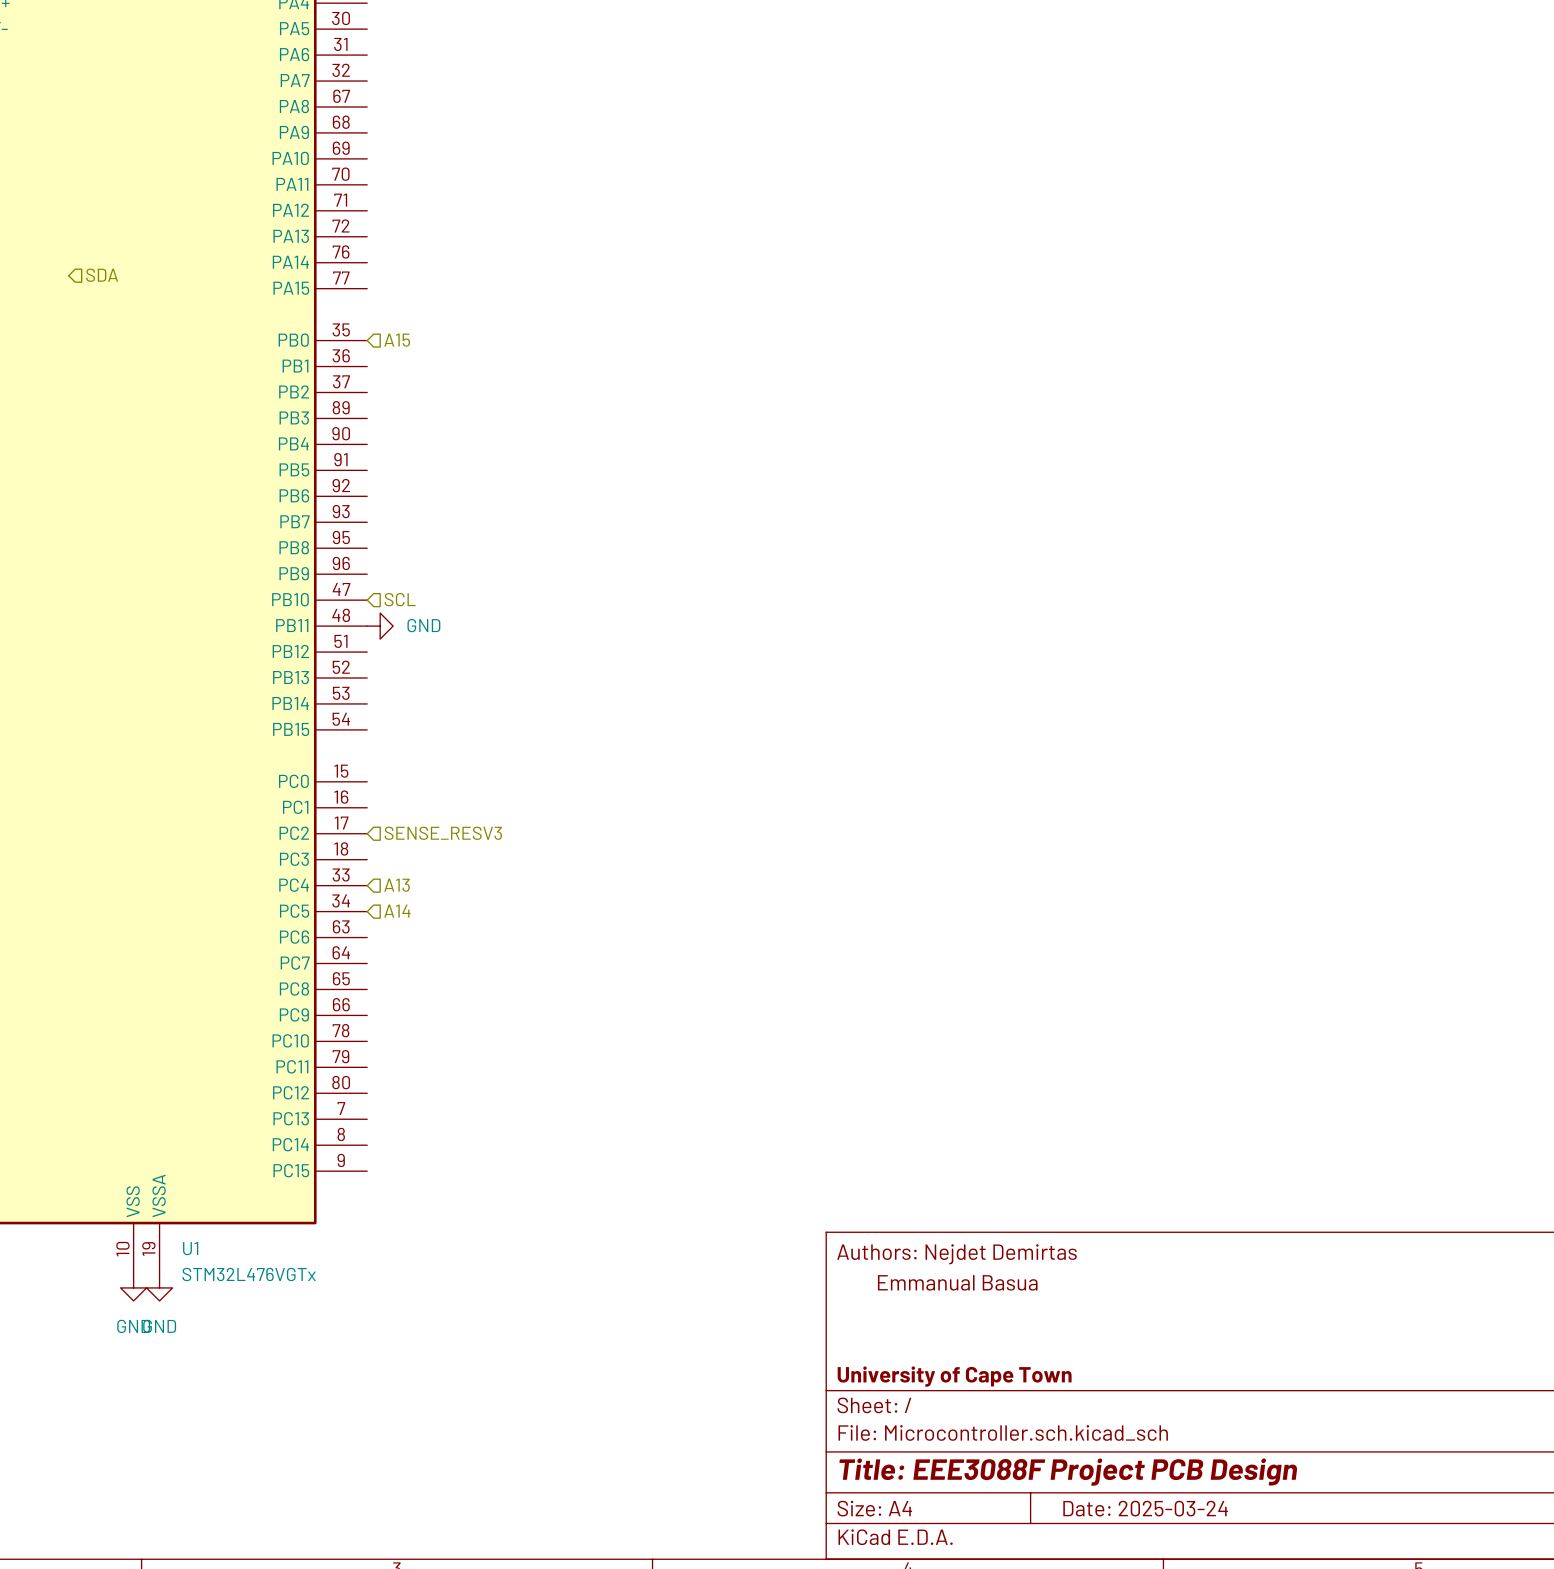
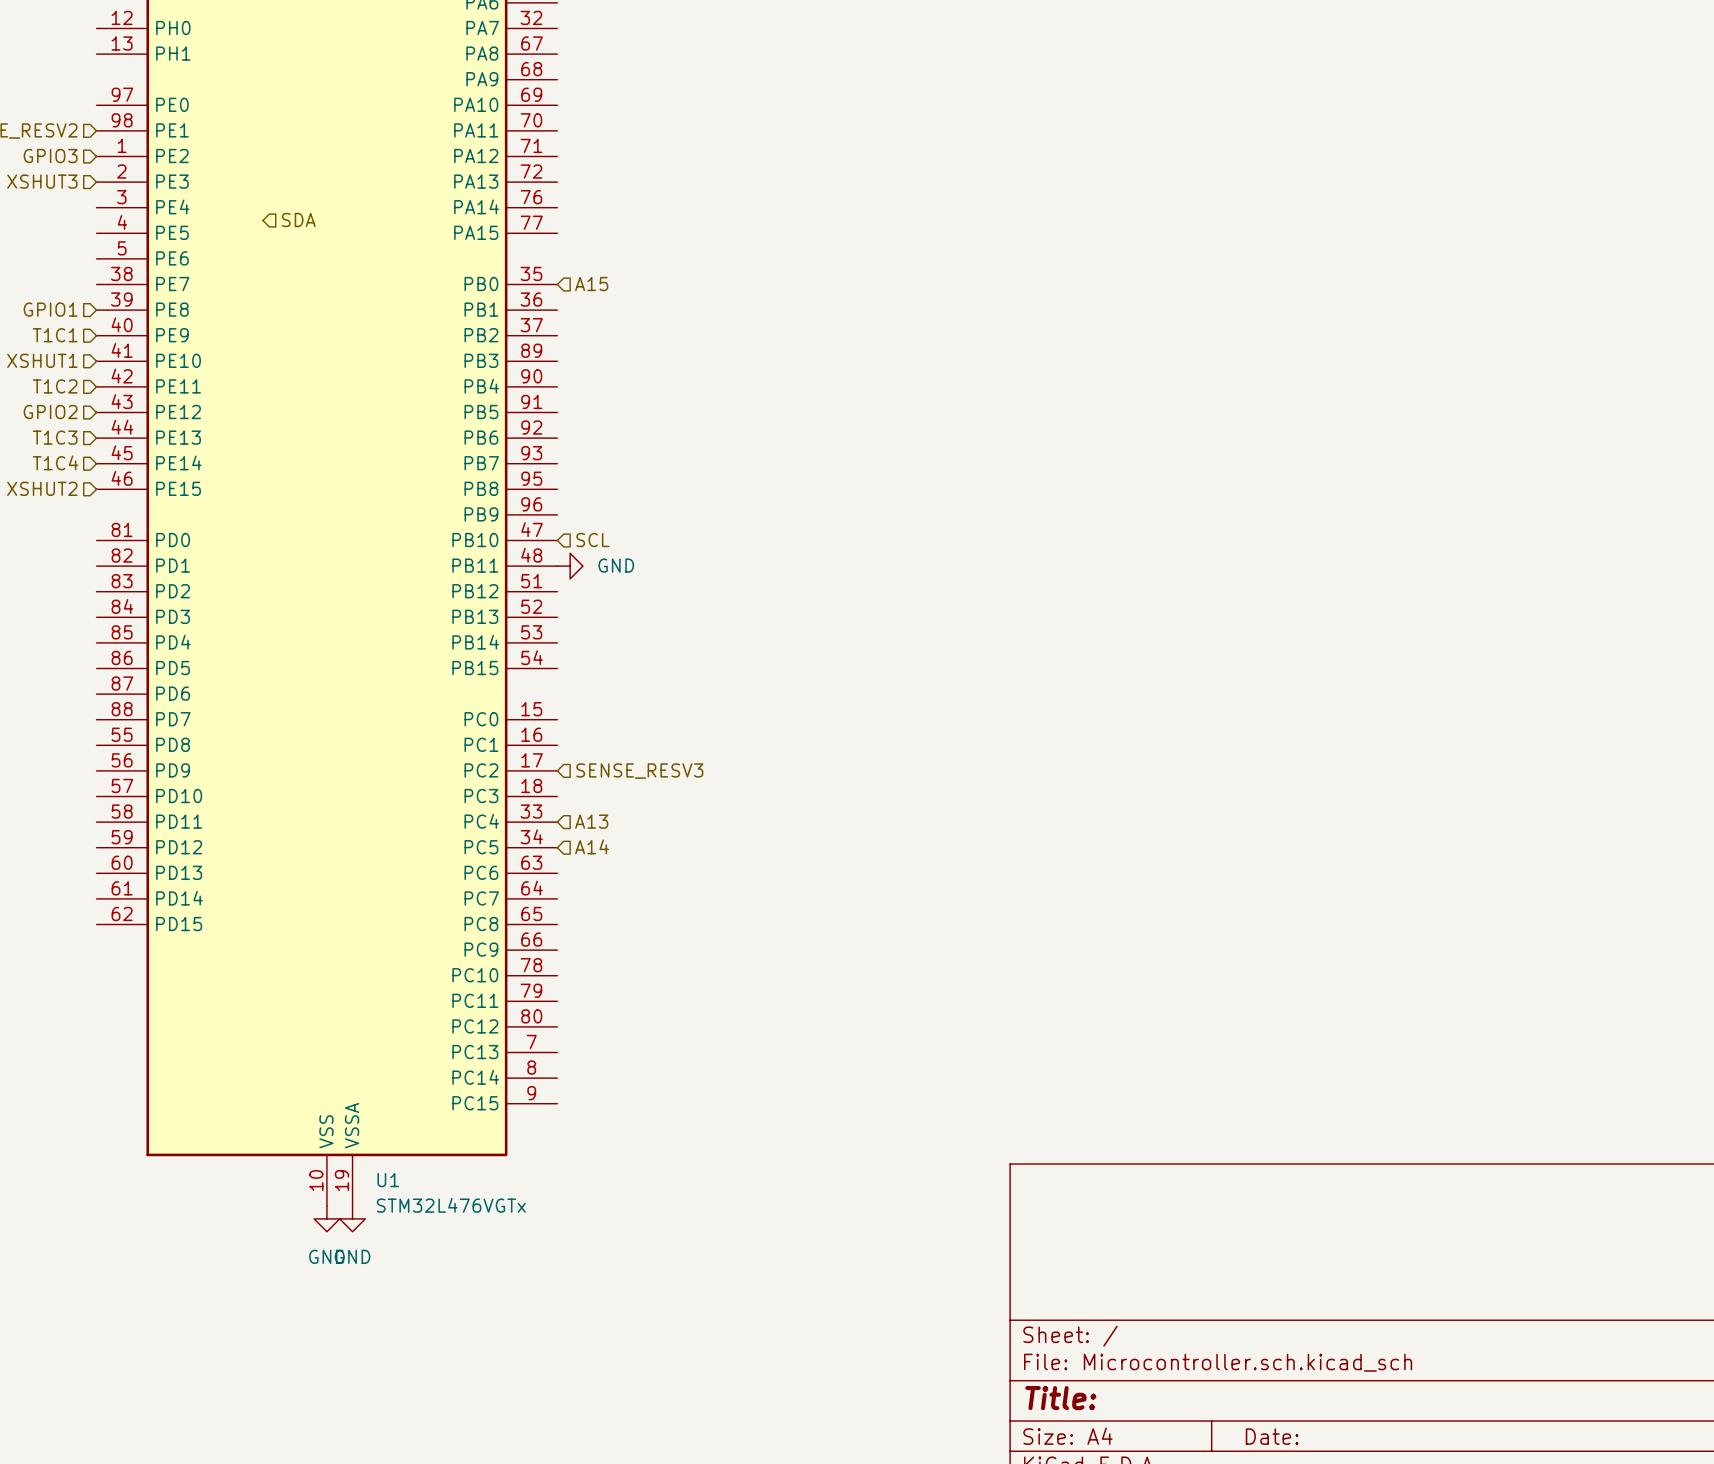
title block: Authors: Nejdet Demirtas (956, 1254) -> none
title block: Emmanual Basua (957, 1282) -> none
title block: University of Cape Town (954, 1376) -> none
title block: Title: EEE3088F Project PCB Design (1068, 1472) -> Title: (1060, 1398)
title block: Date: 2025-03-24 (1145, 1508) -> Date: (1272, 1436)

